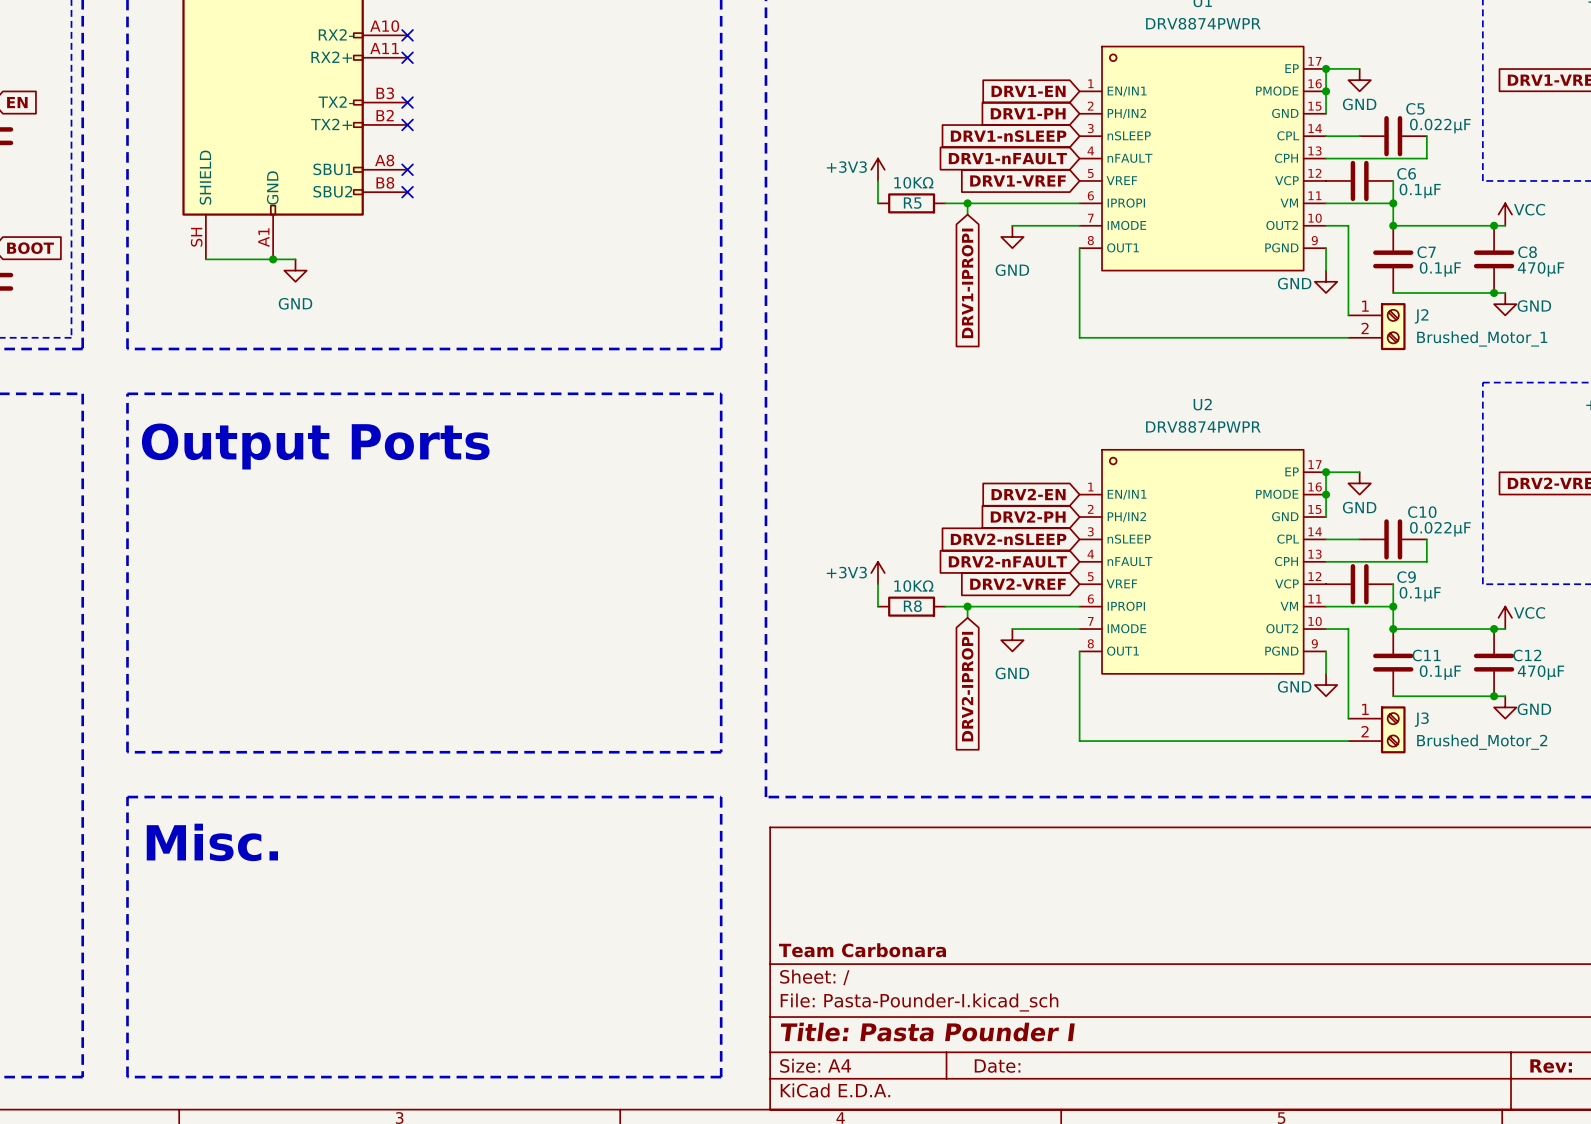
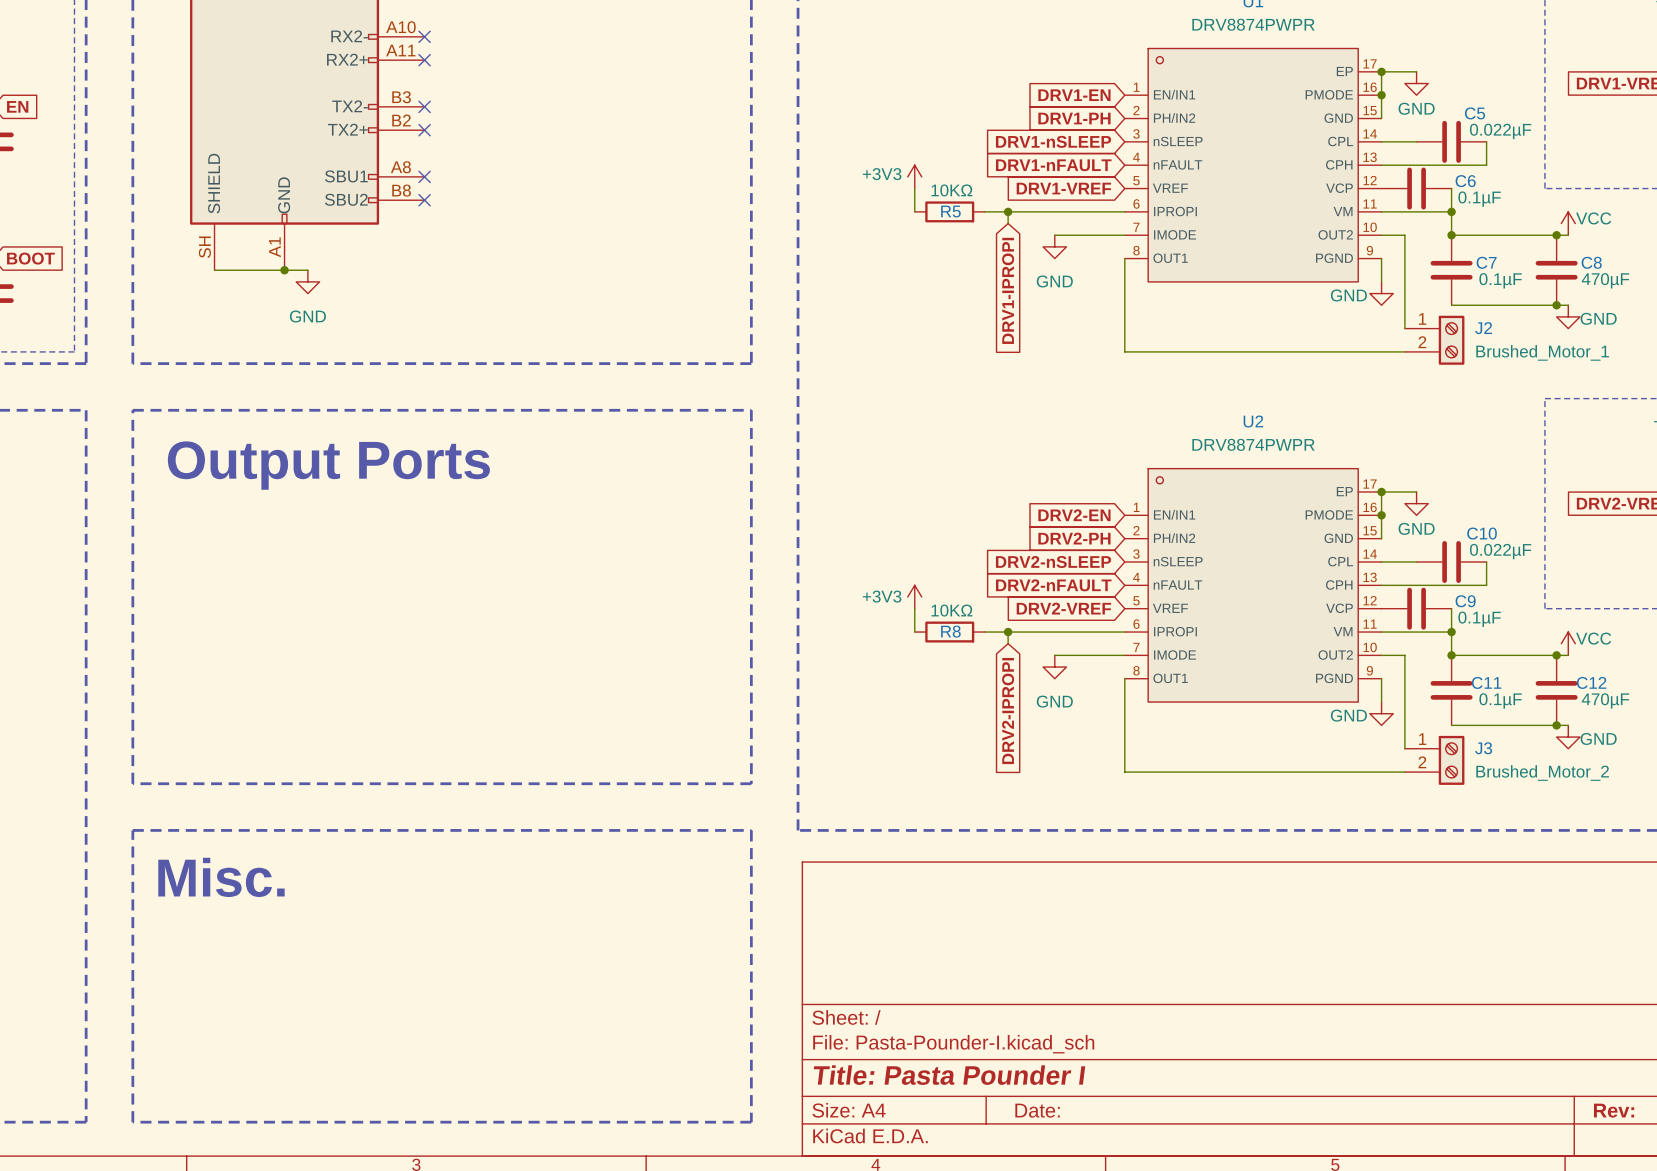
title block: Team Carbonara (862, 950) -> none

